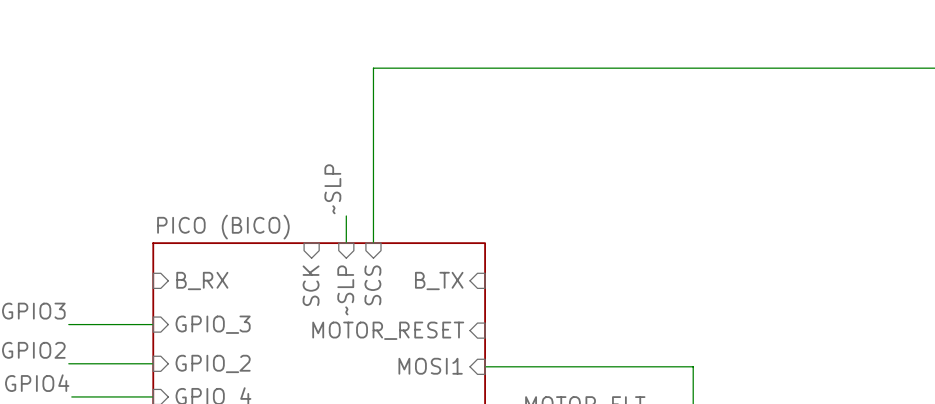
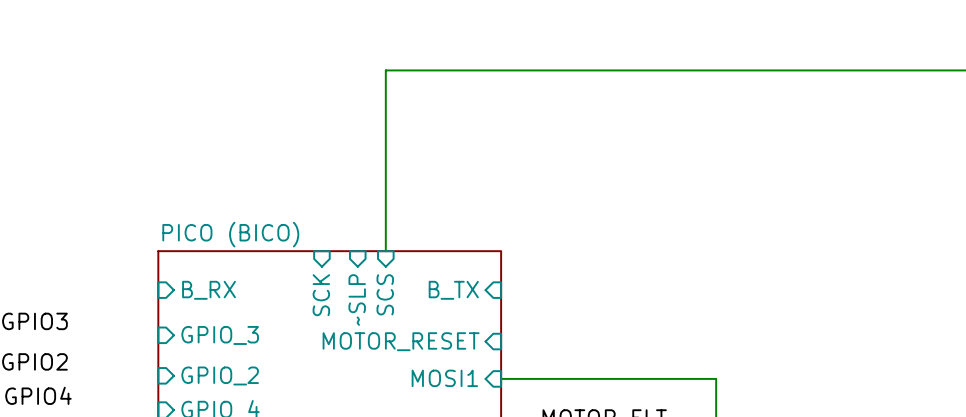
label: ~SLP (332, 189) -> none
wire: (346, 215) (346, 243) -> none
wire: (68, 324) (153, 324) -> none
wire: (68, 363) (153, 363) -> none
wire: (71, 396) (153, 396) -> none

